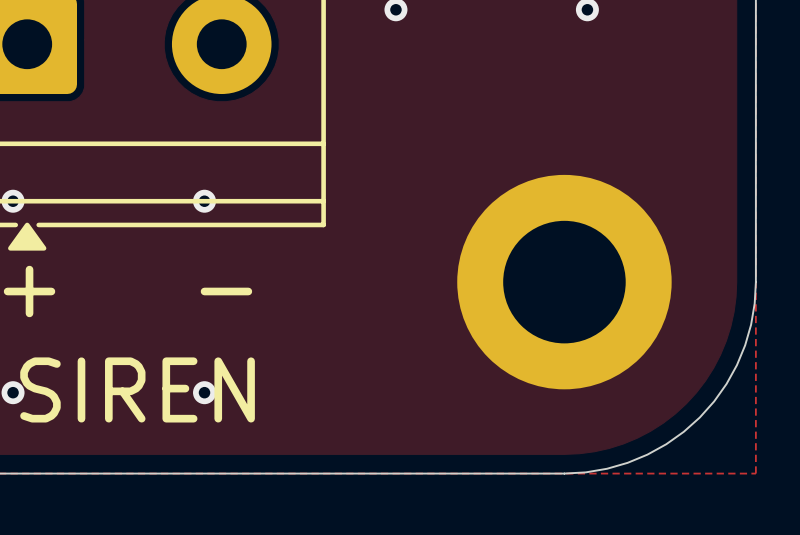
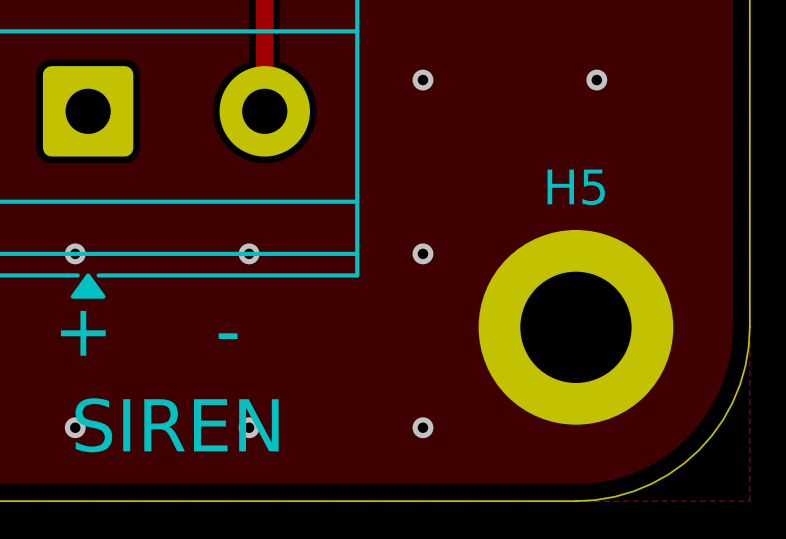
H5 name: none -> H5 (576, 187)
via: none -> (422, 253)
via: none -> (422, 427)

